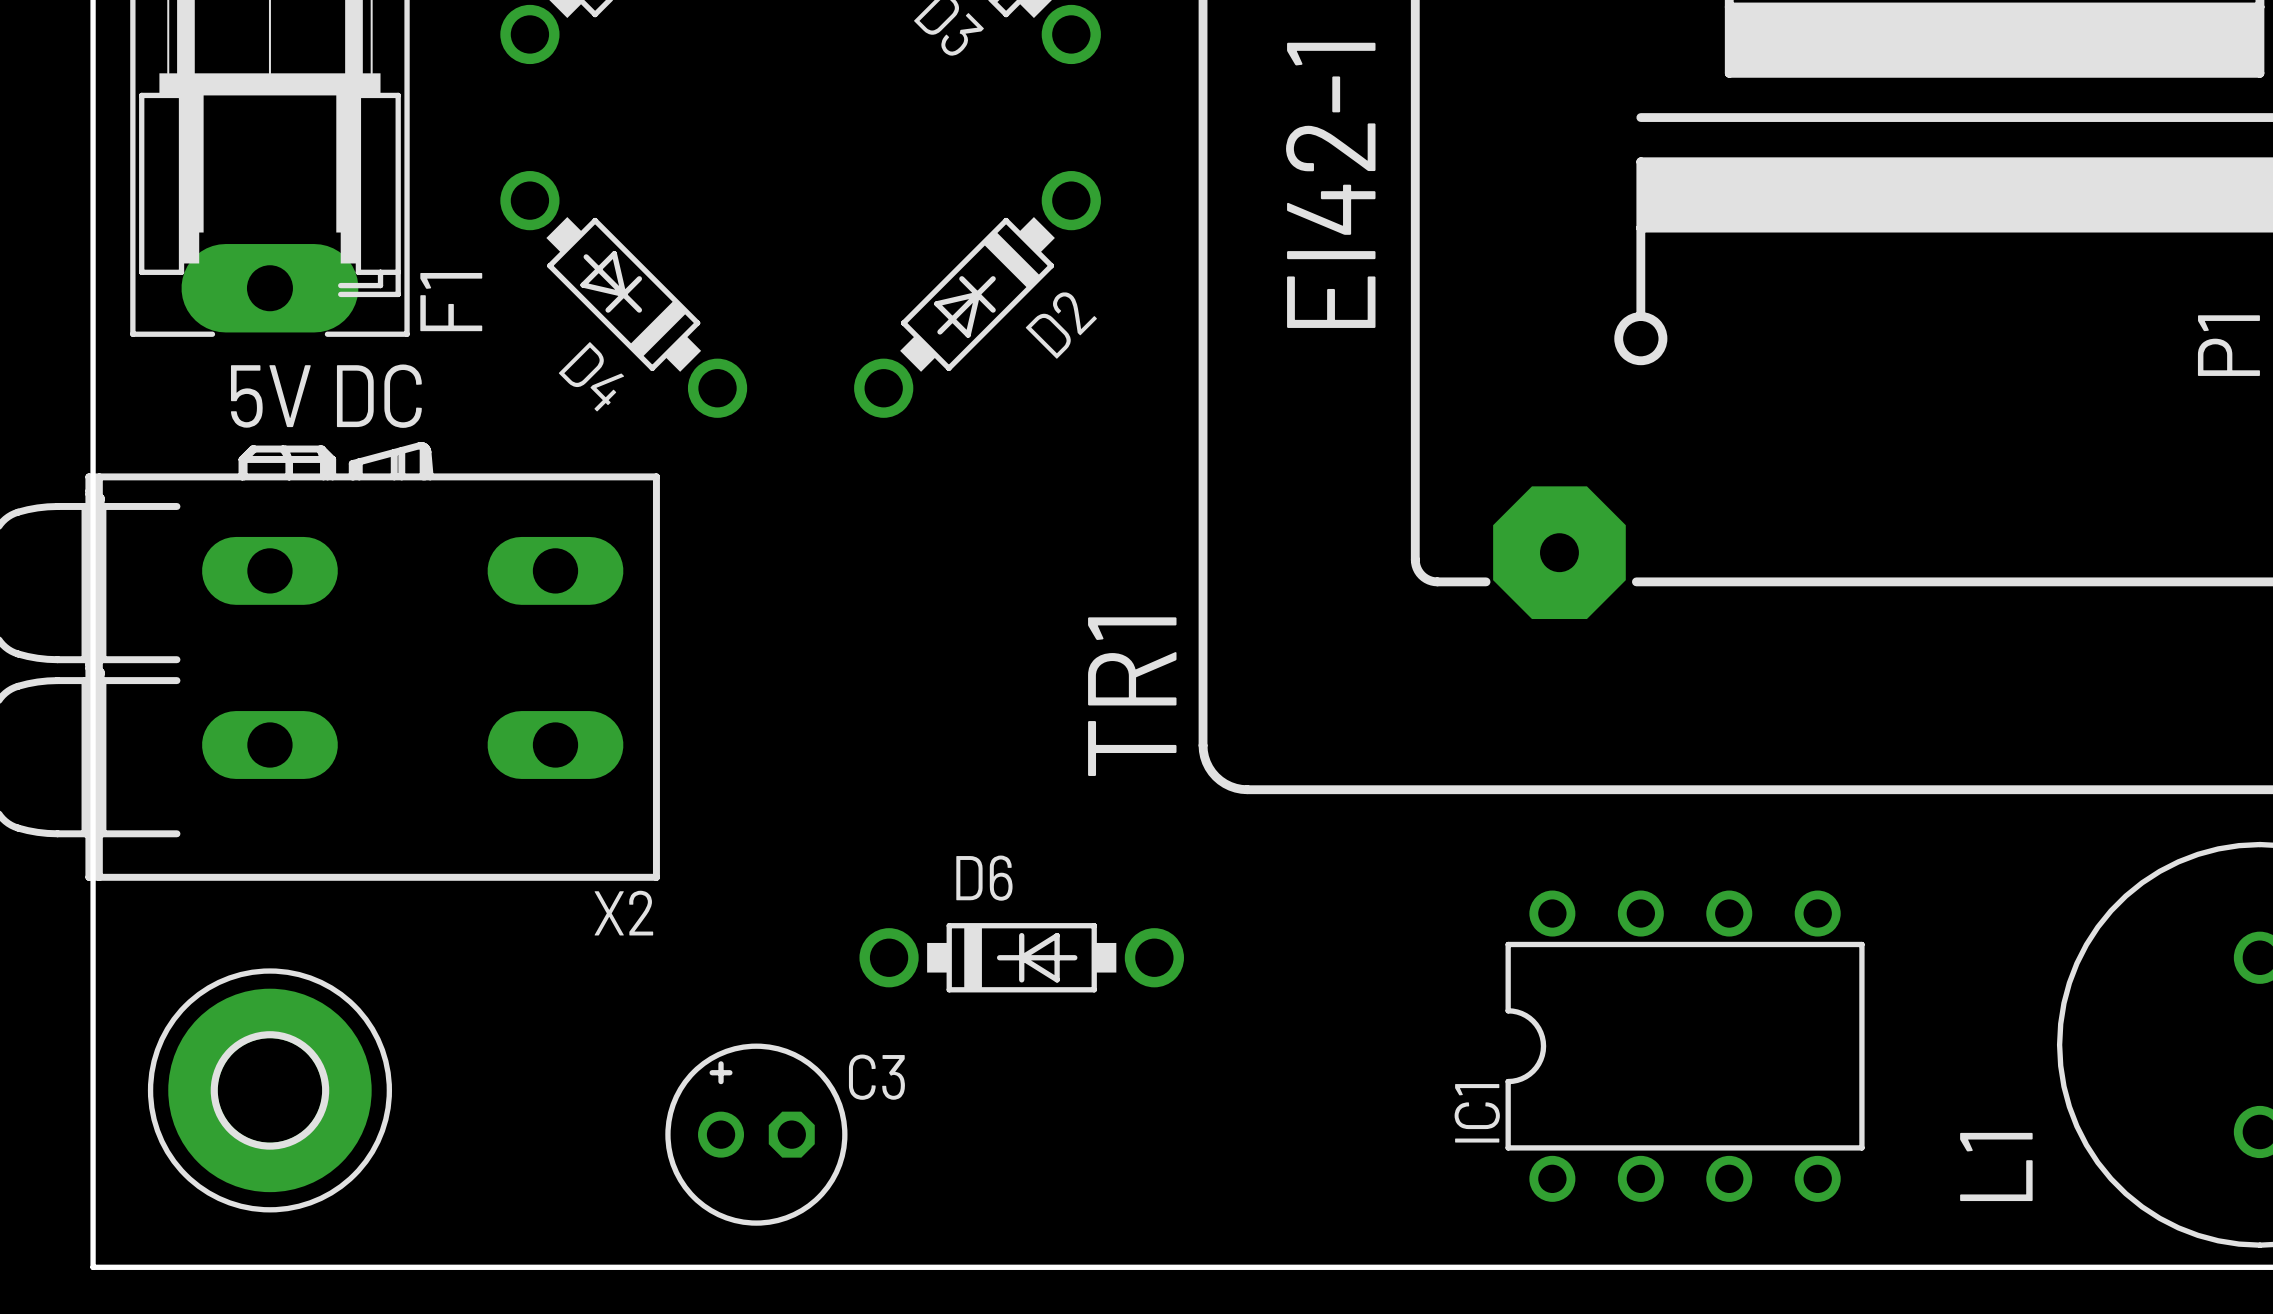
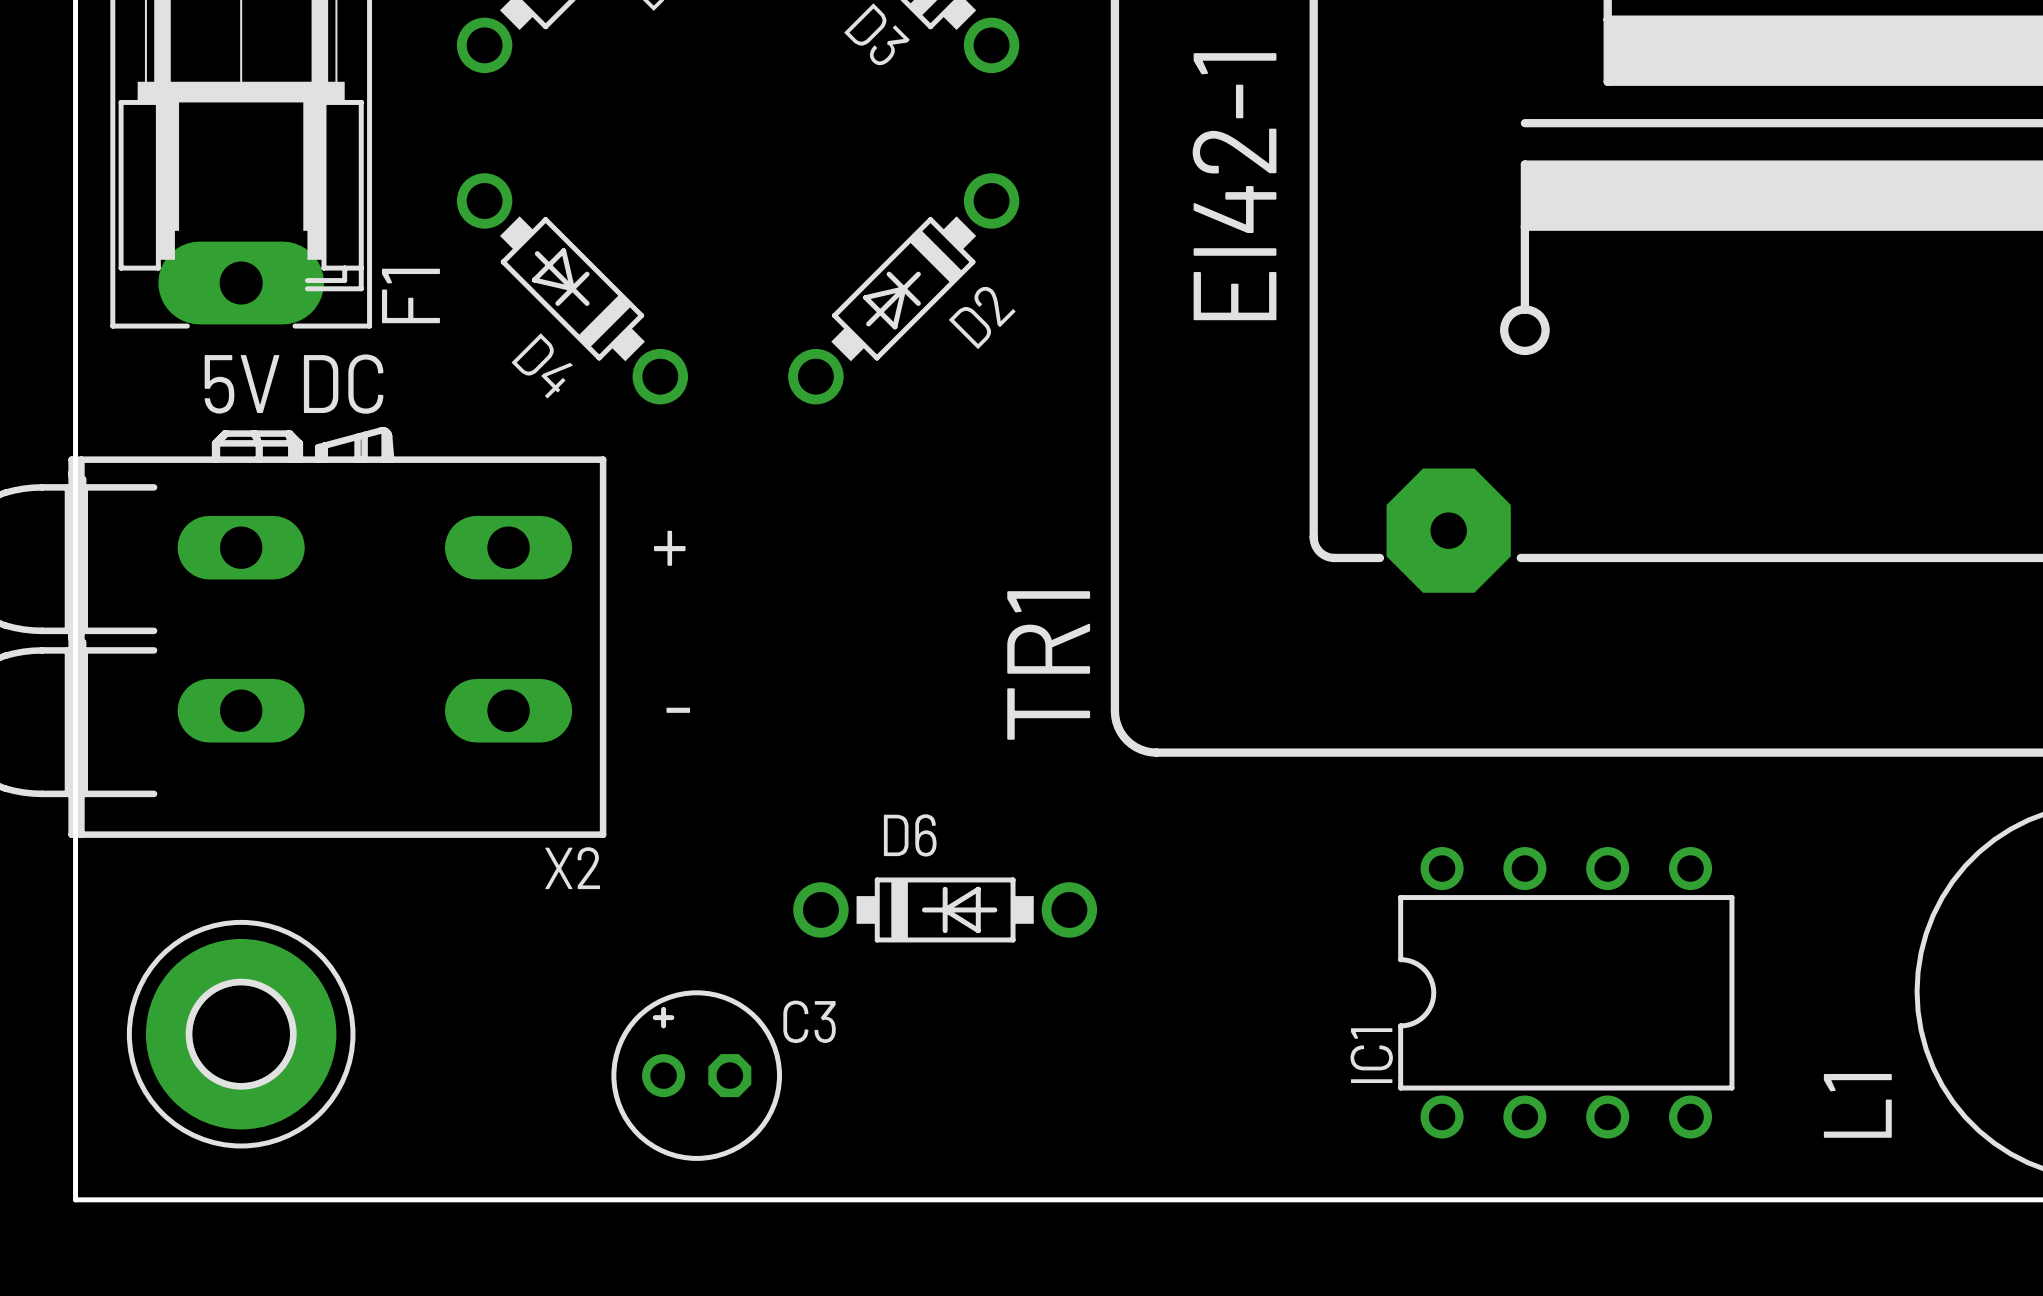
text: none -> + (669, 548)
text: none -> - (678, 710)

